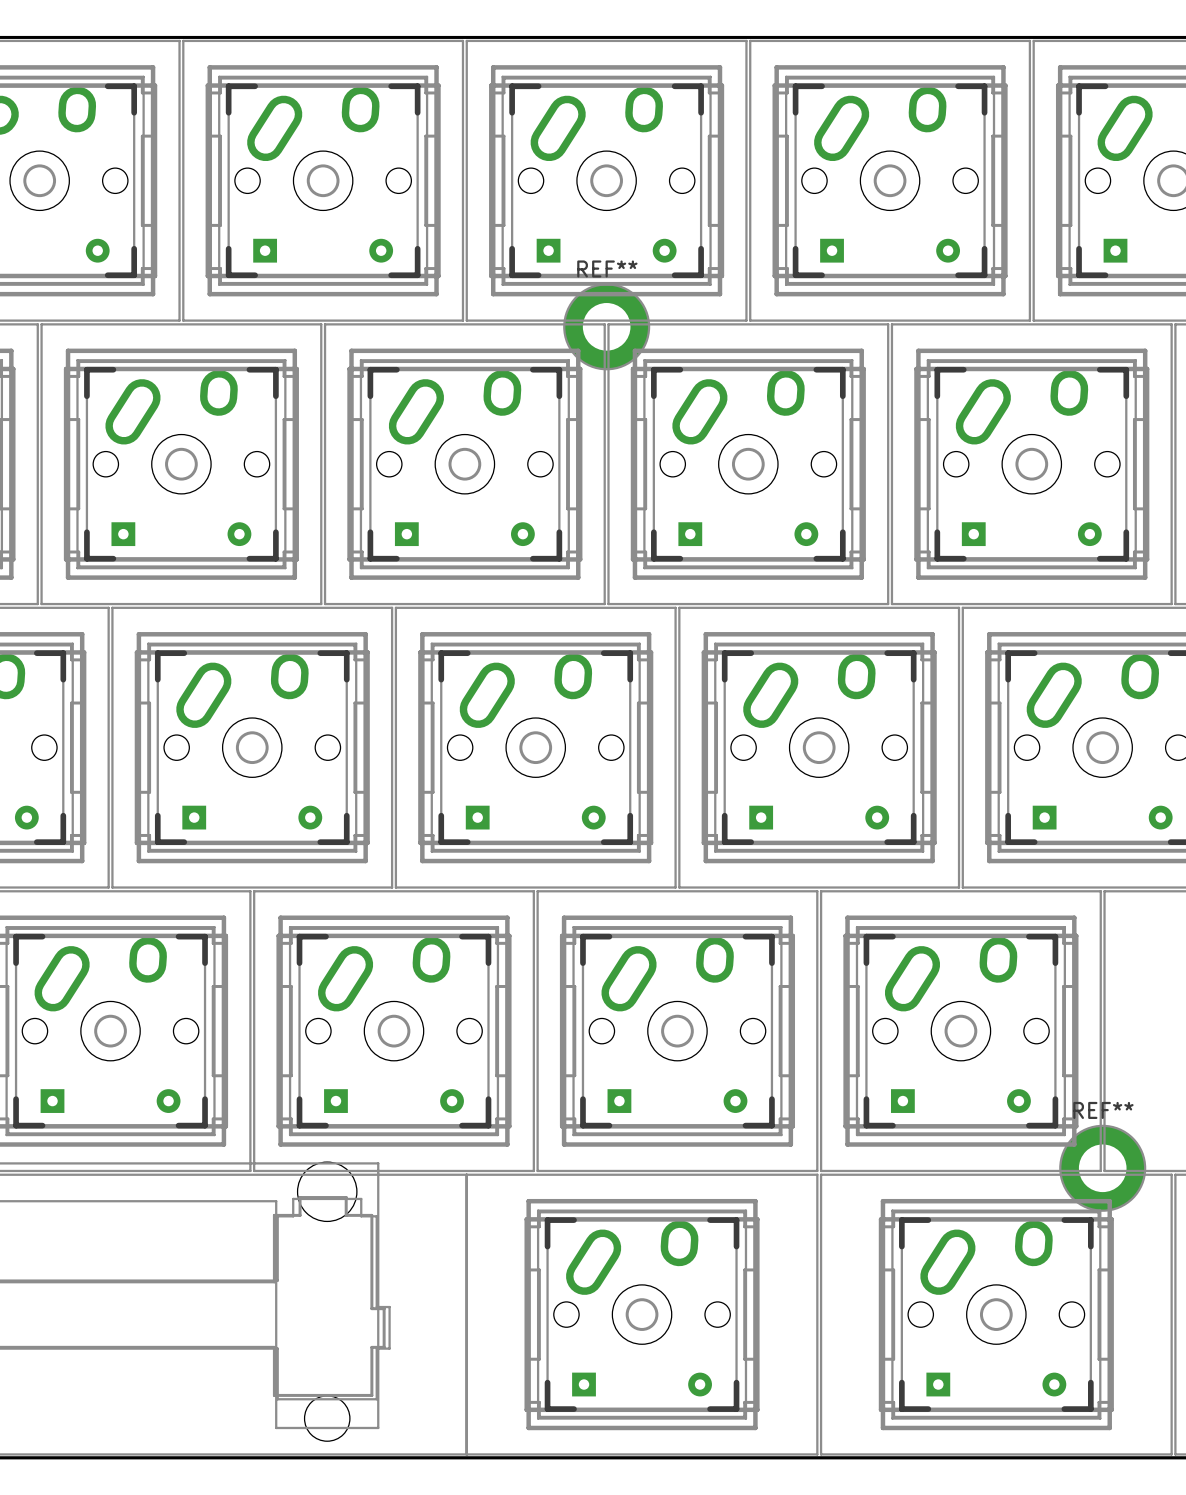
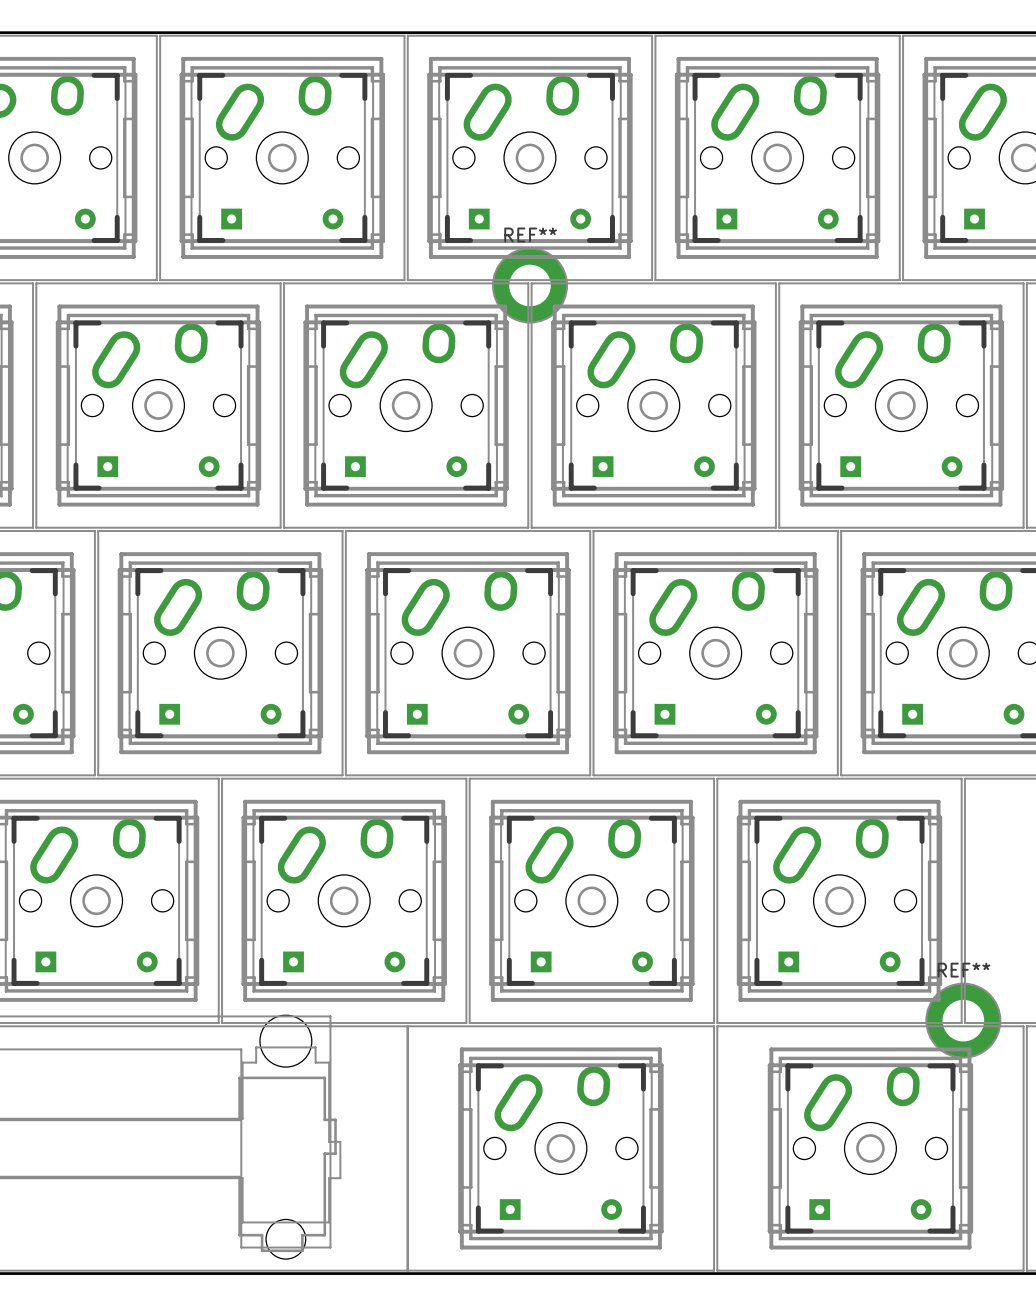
line: (274, 1281) (274, 1215) (300, 1215) (300, 1197) (346, 1197) (346, 1215) (371, 1215) (371, 1308) (384, 1308) -> (239, 1119) (239, 1077) (324, 1077) (324, 1119) (335, 1119) (335, 1143)
line: (384, 1320) (384, 1347) (371, 1347) (371, 1395) (274, 1395) (274, 1347) -> (335, 1153) (324, 1153) (324, 1235) (302, 1235) (302, 1250) (262, 1250) (262, 1235) (239, 1235) (239, 1177)

